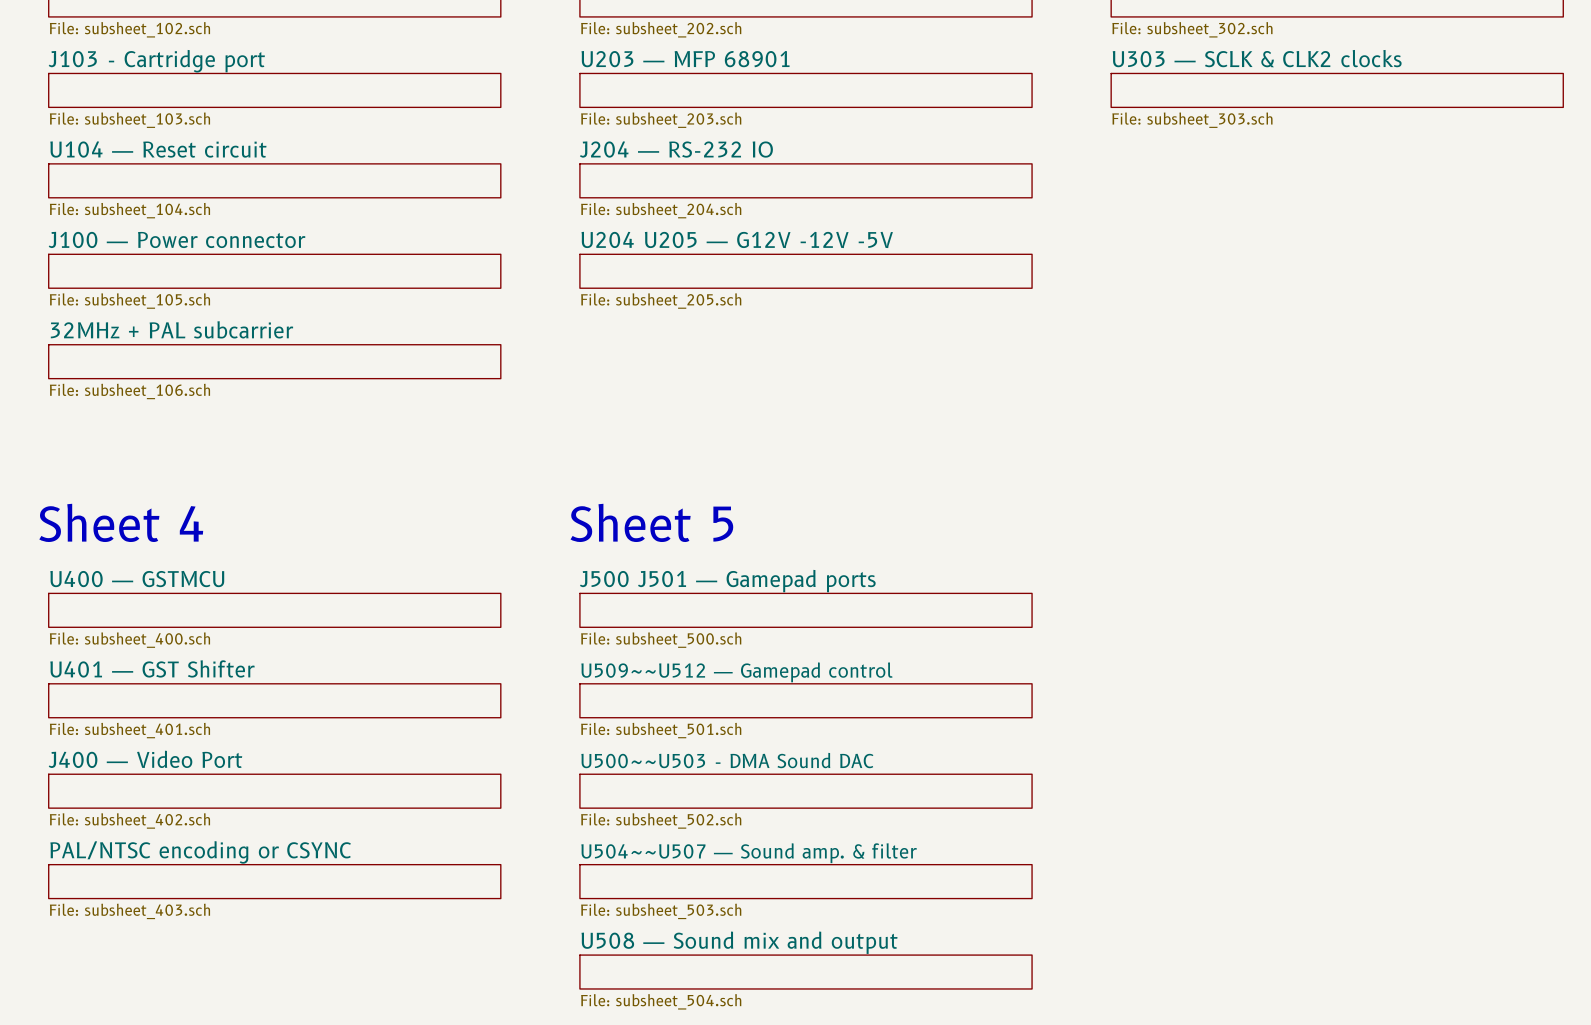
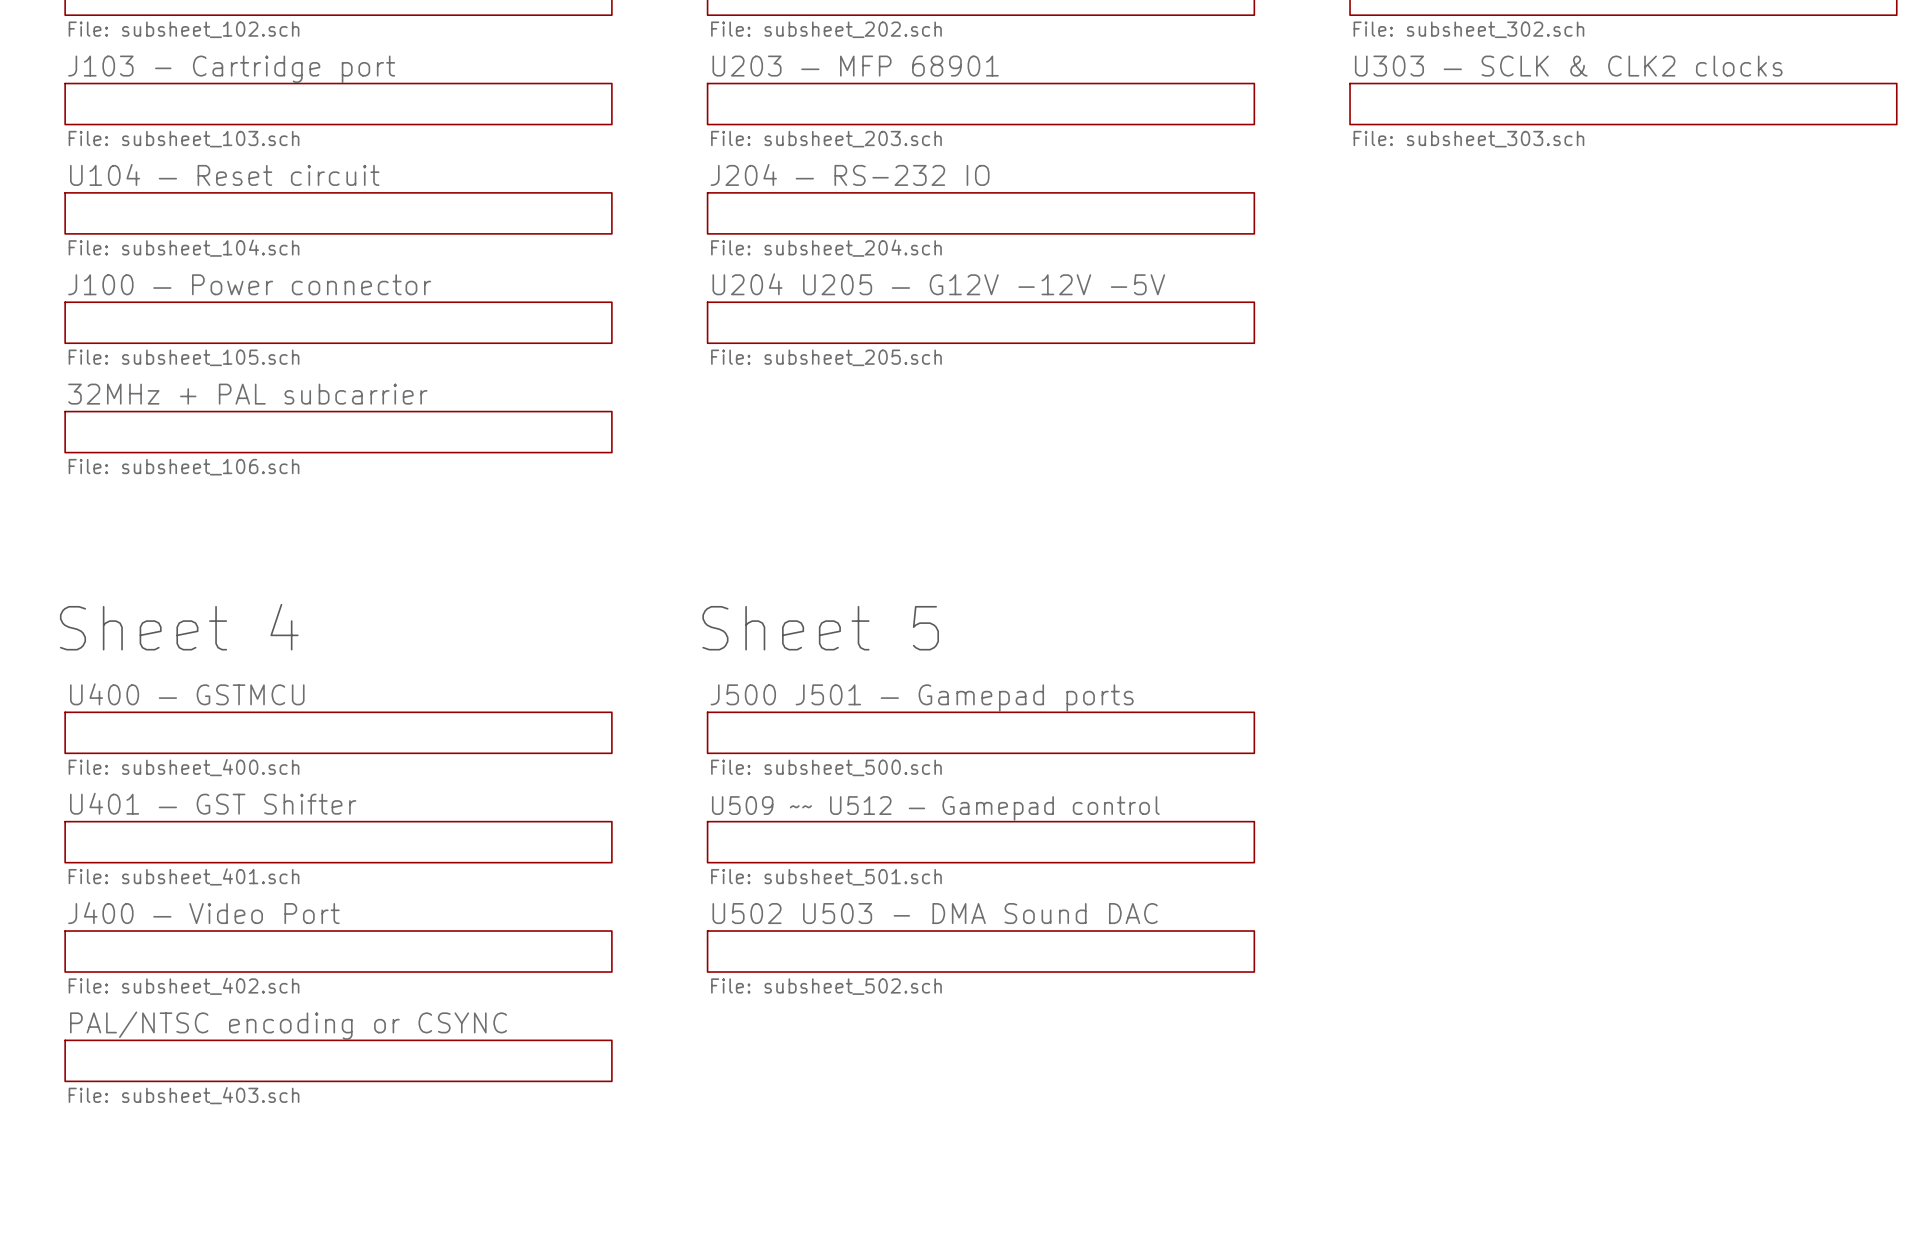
sheet U509~~U512 — Gamepad control name: U509~~U512 — Gamepad control (736, 672) -> U509 ~~ U512 — Gamepad control (935, 808)
sheet U500~~U503 - DMA Sound DAC name: U500~~U503 - DMA Sound DAC (727, 760) -> U502 U503 - DMA Sound DAC (935, 913)
sheet U504~~U507 — Sound amp. & filter: File: subsheet_503.sch (805, 881) -> none
sheet U508 — Sound mix and output: File: subsheet_504.sch (805, 972) -> none

